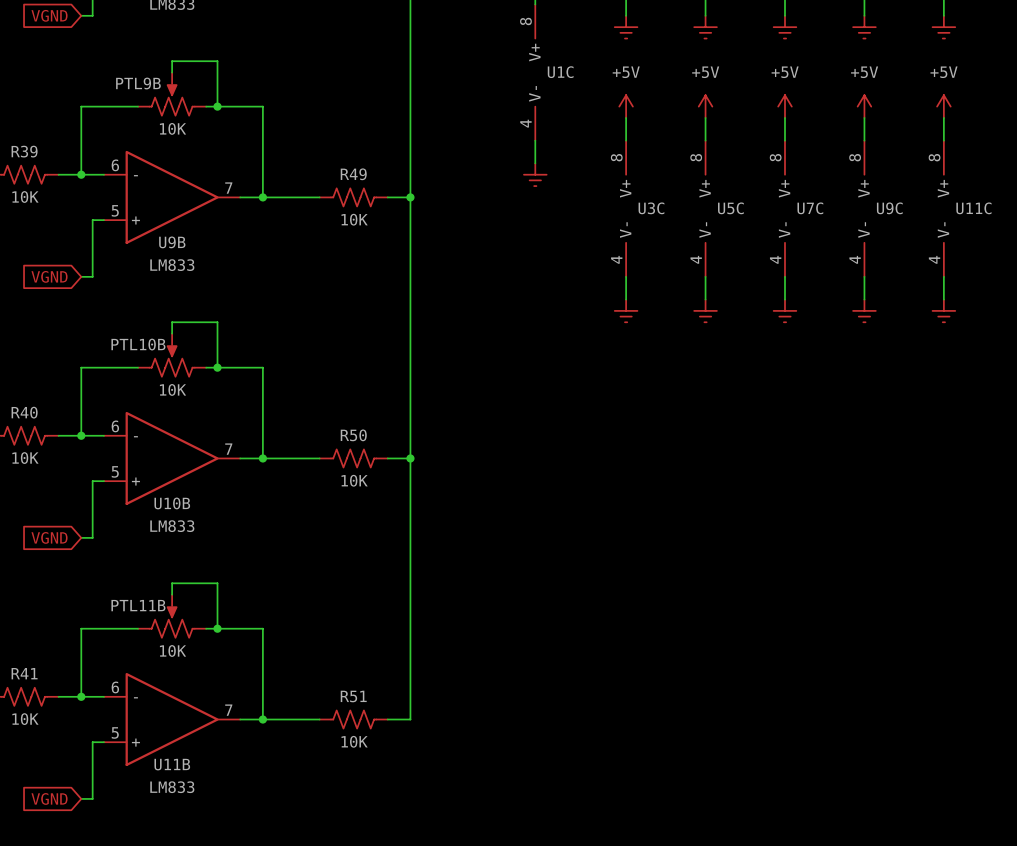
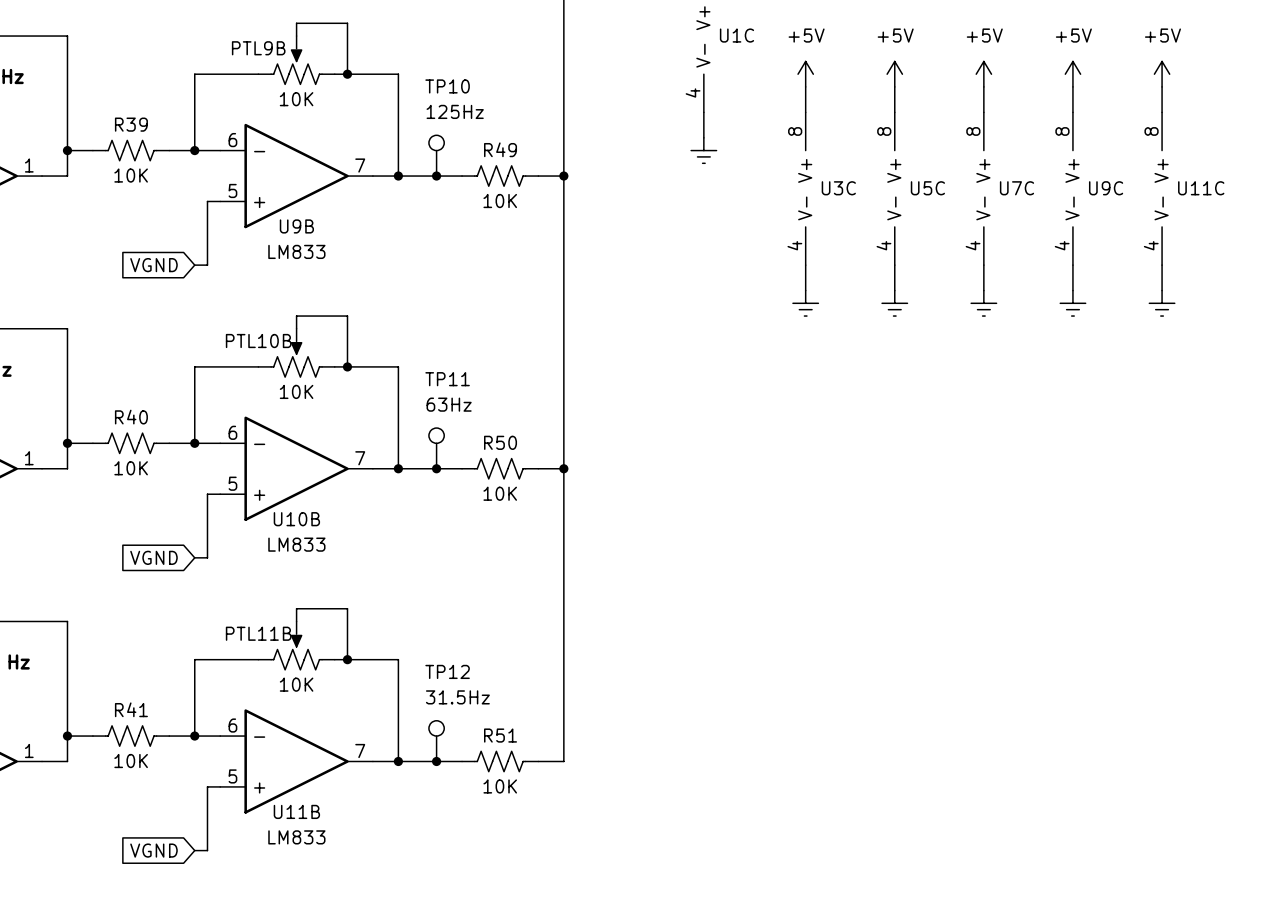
TP10: none -> 125Hz (436, 155)
junction: none -> (436, 176)
TP11: none -> 63Hz (436, 448)
junction: none -> (436, 468)
TP12: none -> 31.5Hz (436, 741)
junction: none -> (436, 761)

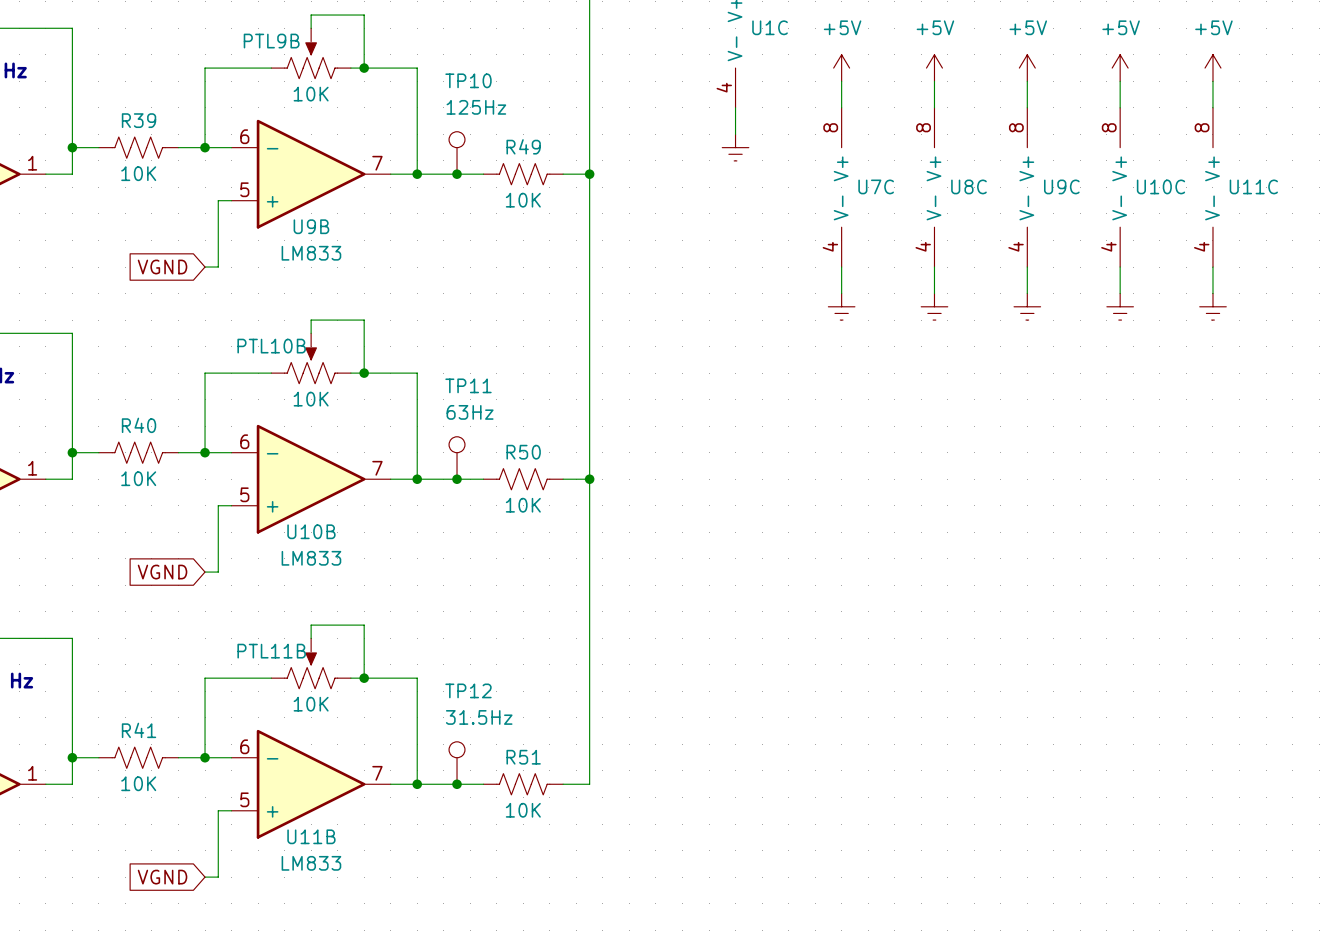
U3C name: U3C (838, 188) -> U7C (876, 186)
U5C name: U5C (927, 188) -> U8C (968, 186)
U7C name: U7C (1016, 188) -> U9C (1061, 186)
U9C name: U9C (1106, 188) -> U10C (1160, 186)

